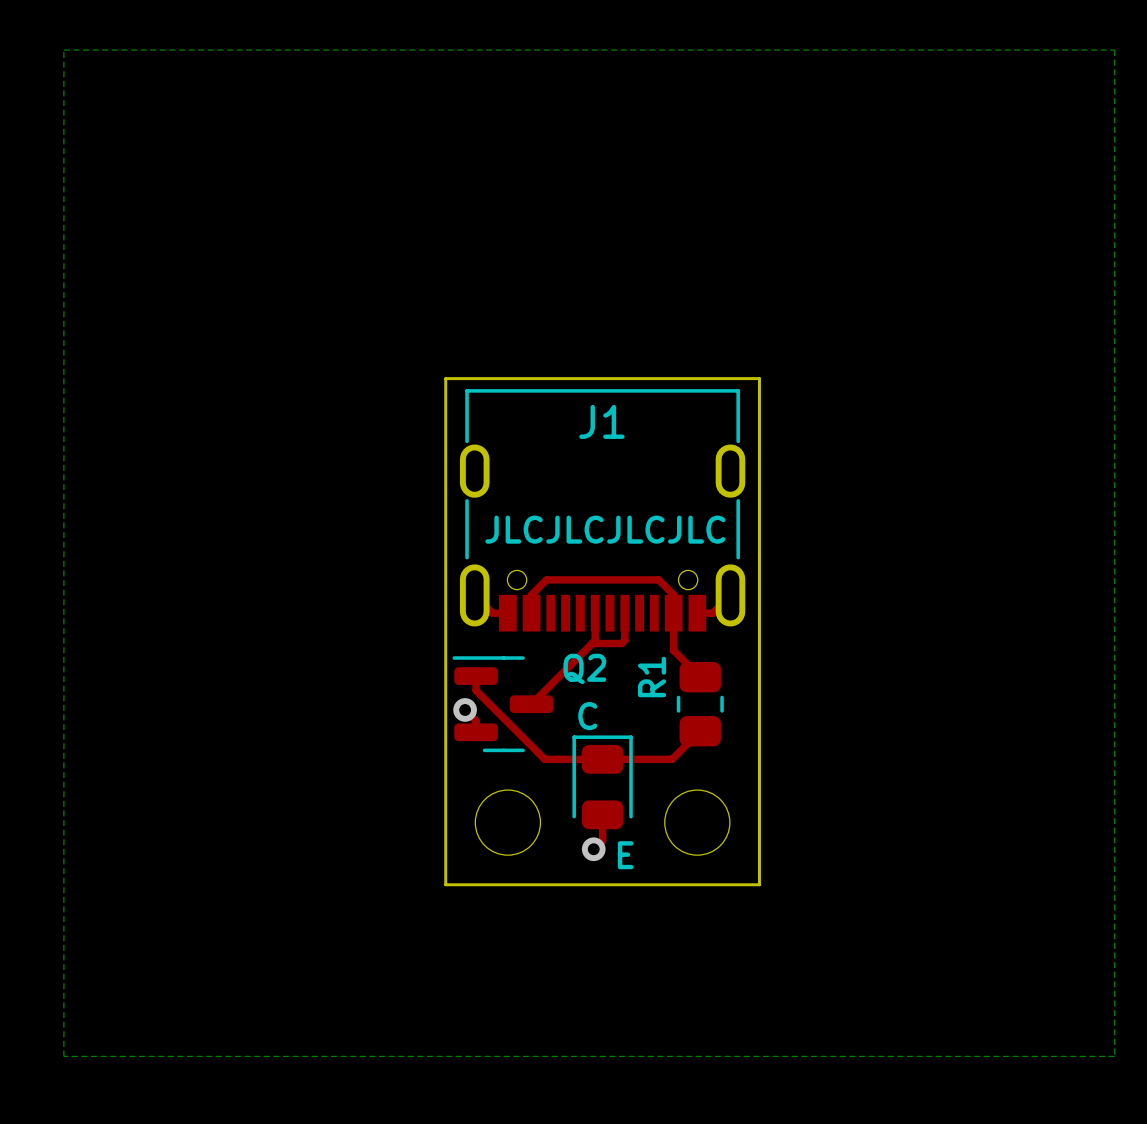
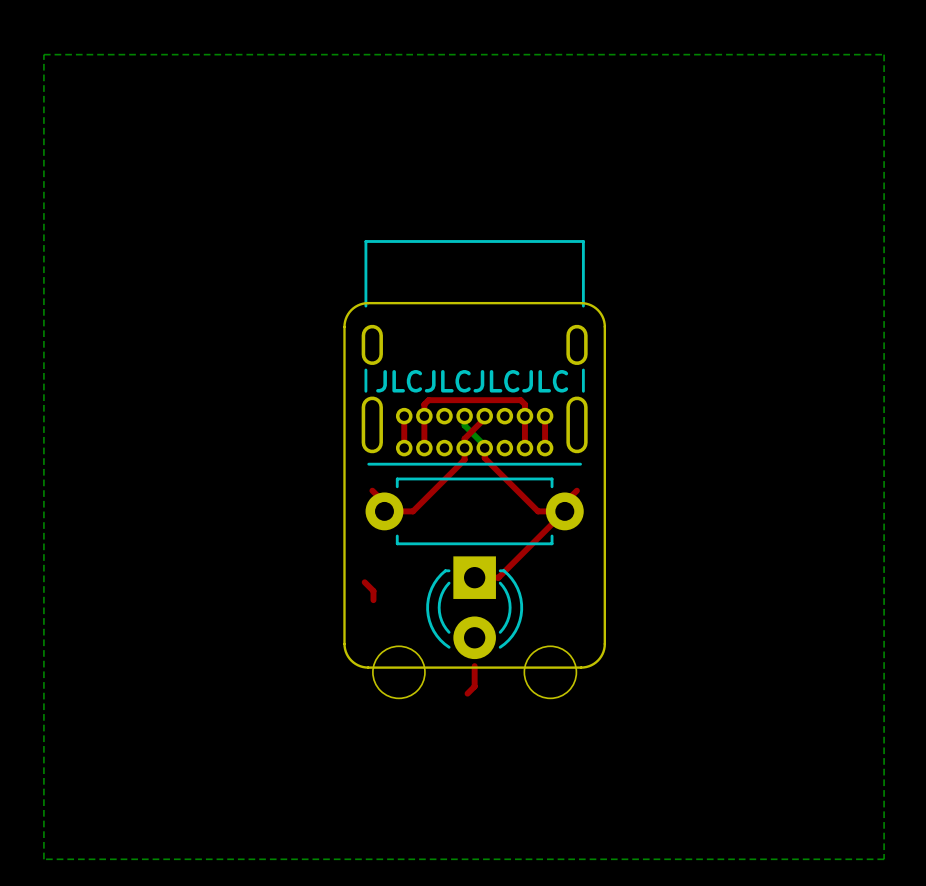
board edge: (445, 378) (759, 378) (759, 884) (445, 884) (445, 378) -> (368, 303) (353, 308) (348, 314) (344, 324) (344, 643) (348, 656) (355, 663) (368, 667) (581, 667) (593, 663) (601, 656) (604, 643) (604, 326) (601, 314) (591, 305) (581, 303) (368, 303)
part: none -> (474, 352)
top track: none -> (404, 416) (404, 448)
bottom track: none -> (464, 416) (464, 425) (484, 445) (484, 448)
top track: none -> (484, 416) (484, 418) (464, 438) (464, 459) (413, 511) (384, 511)
top track: none -> (545, 416) (545, 448)
J1: (602, 510) -> none
text position: JLCJLCJLCJLC (605, 529) -> JLCJLCJLCJLC (472, 381)
top track: none -> (424, 448) (424, 404) (428, 400) (520, 400) (524, 404) (524, 448)
top track: none -> (484, 448) (484, 458) (538, 511) (564, 511) (498, 577) (474, 577)
top track: (531, 613) (531, 594) (546, 579) (658, 579) (673, 594) (673, 650) (700, 677) -> none
top track: (595, 613) (595, 640) (531, 704) -> none
top track: (624, 613) (624, 640) (621, 643) (592, 643) -> none
part: none -> (474, 511)
top track: (476, 676) (476, 690) (544, 759) (672, 759) (700, 731) -> none
Q2: (502, 704) -> none
R1: (700, 704) -> none
via: (465, 709) -> none
text: C (587, 716) -> none
part: none -> (474, 607)
part: (602, 782) -> none
via: (593, 849) -> none
text: E (625, 855) -> none

